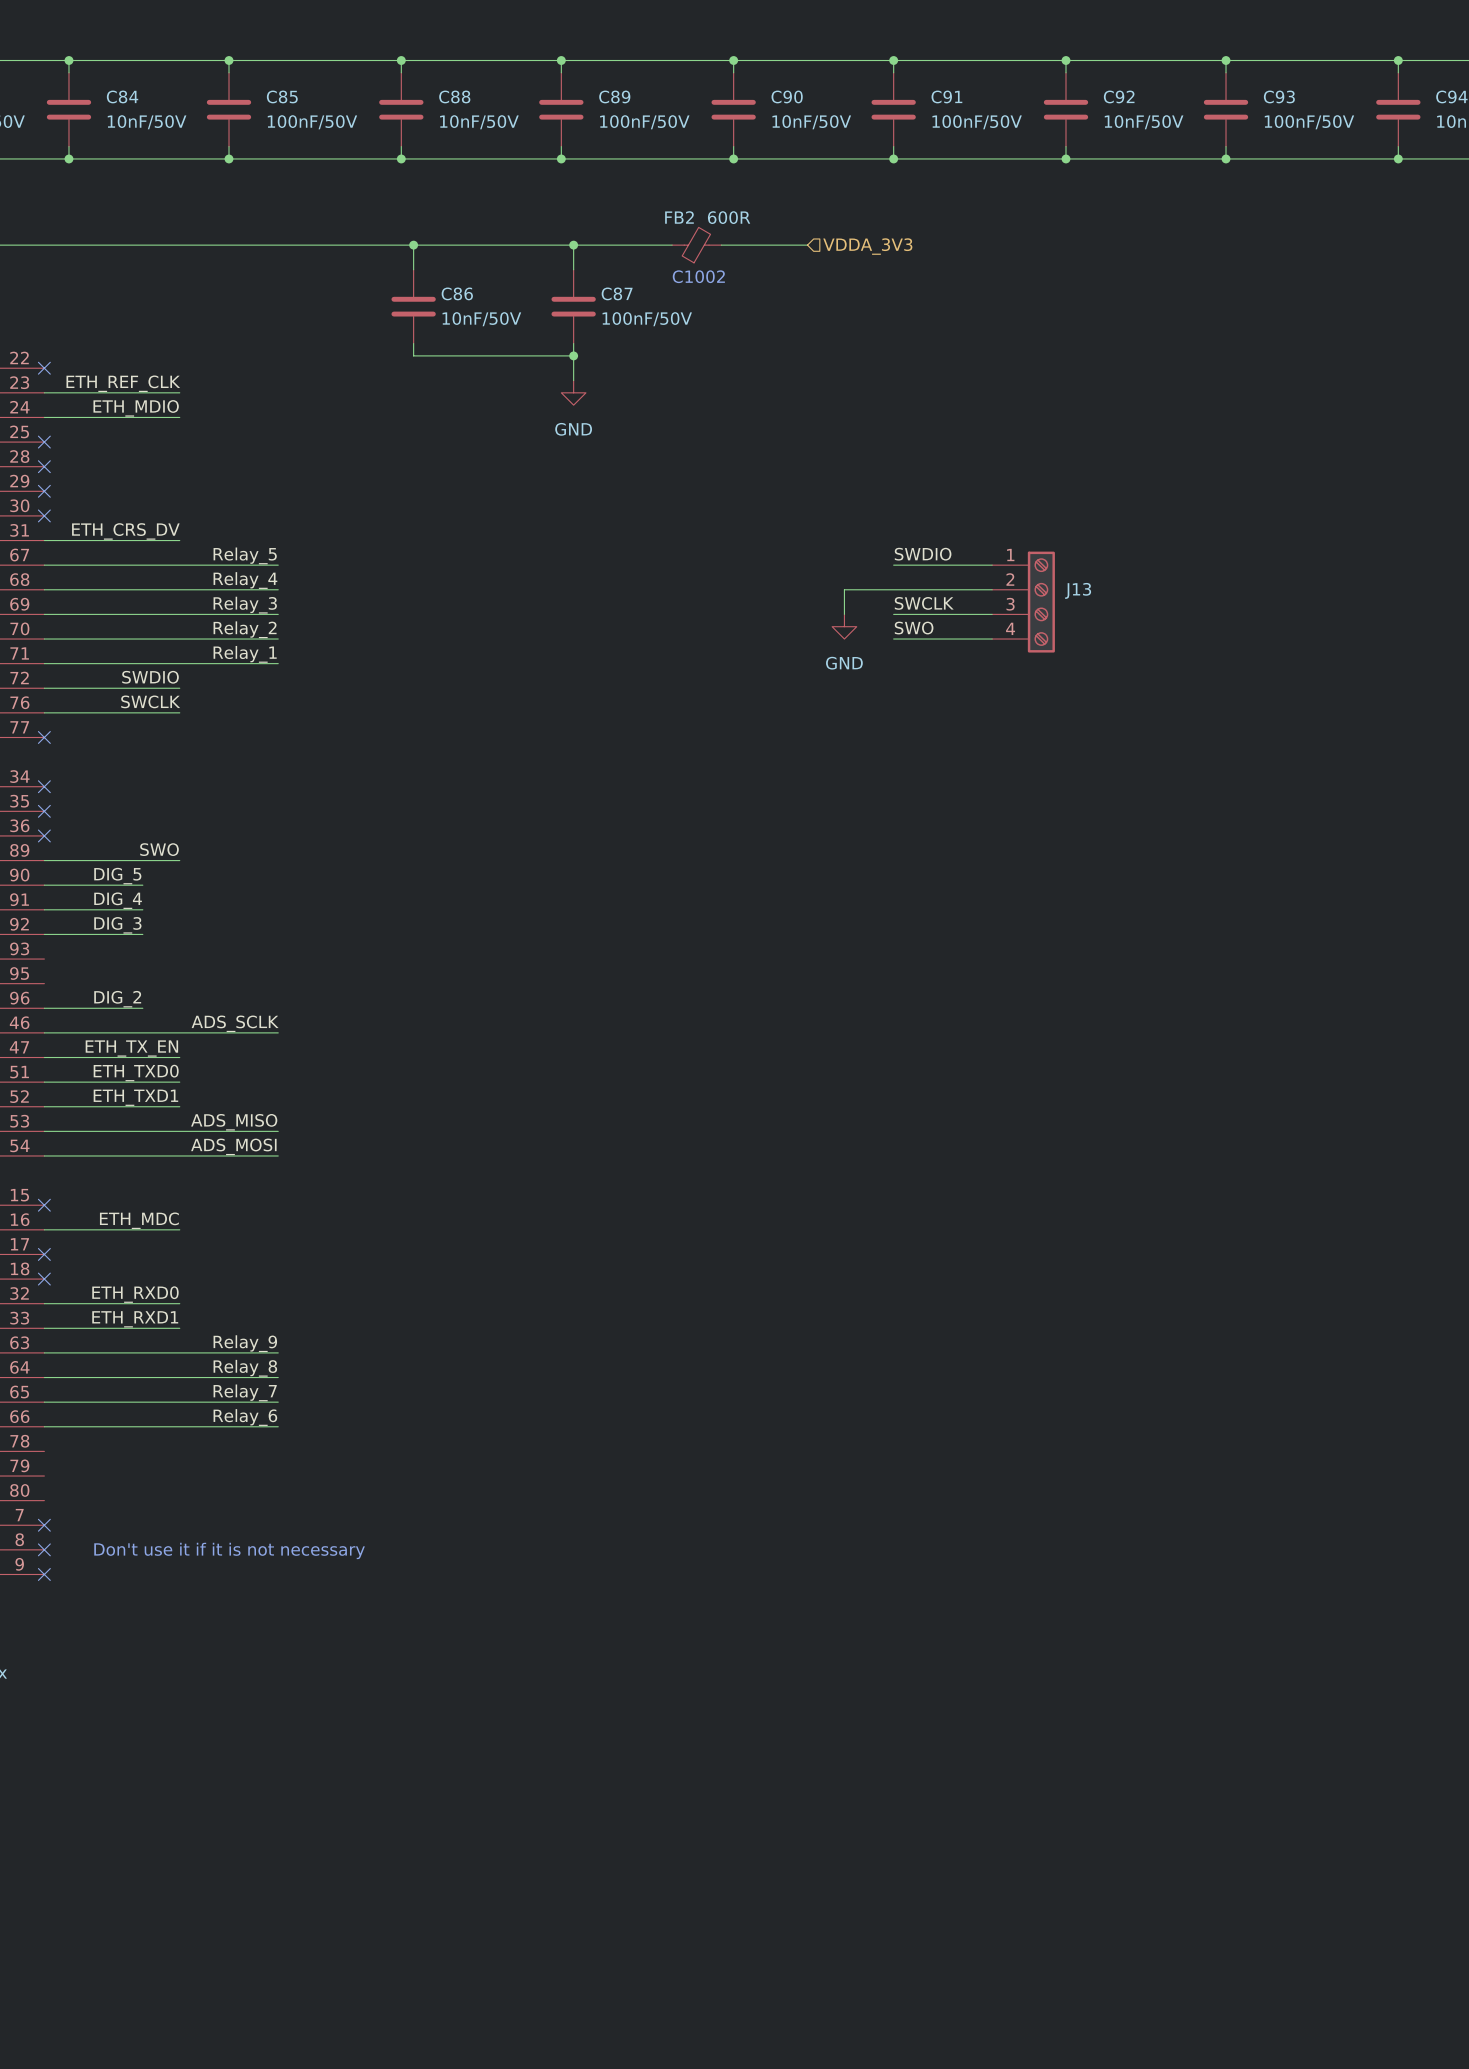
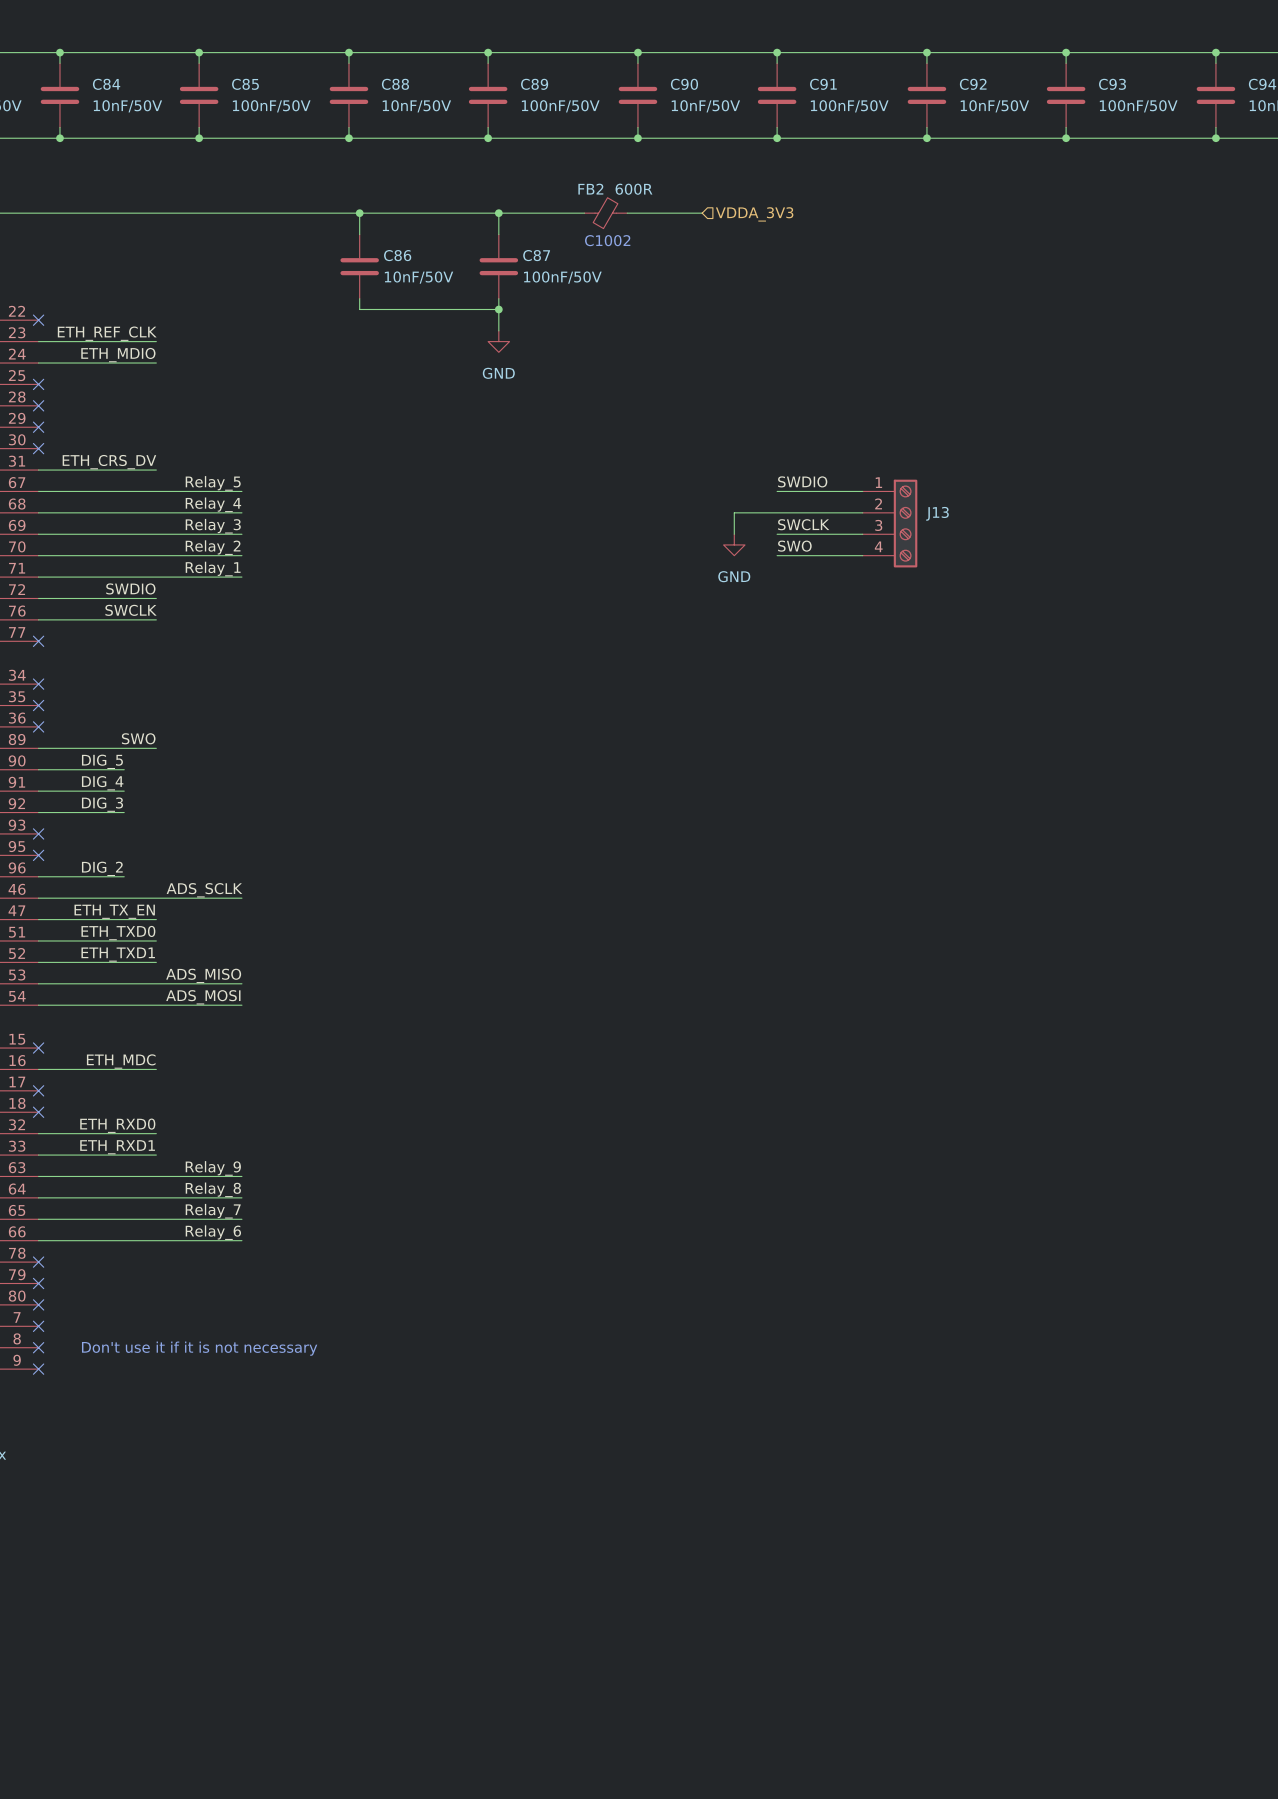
no-connect mark: none -> (38, 833)
no-connect mark: none -> (38, 855)
no-connect mark: none -> (38, 1262)
no-connect mark: none -> (38, 1283)
no-connect mark: none -> (38, 1304)

